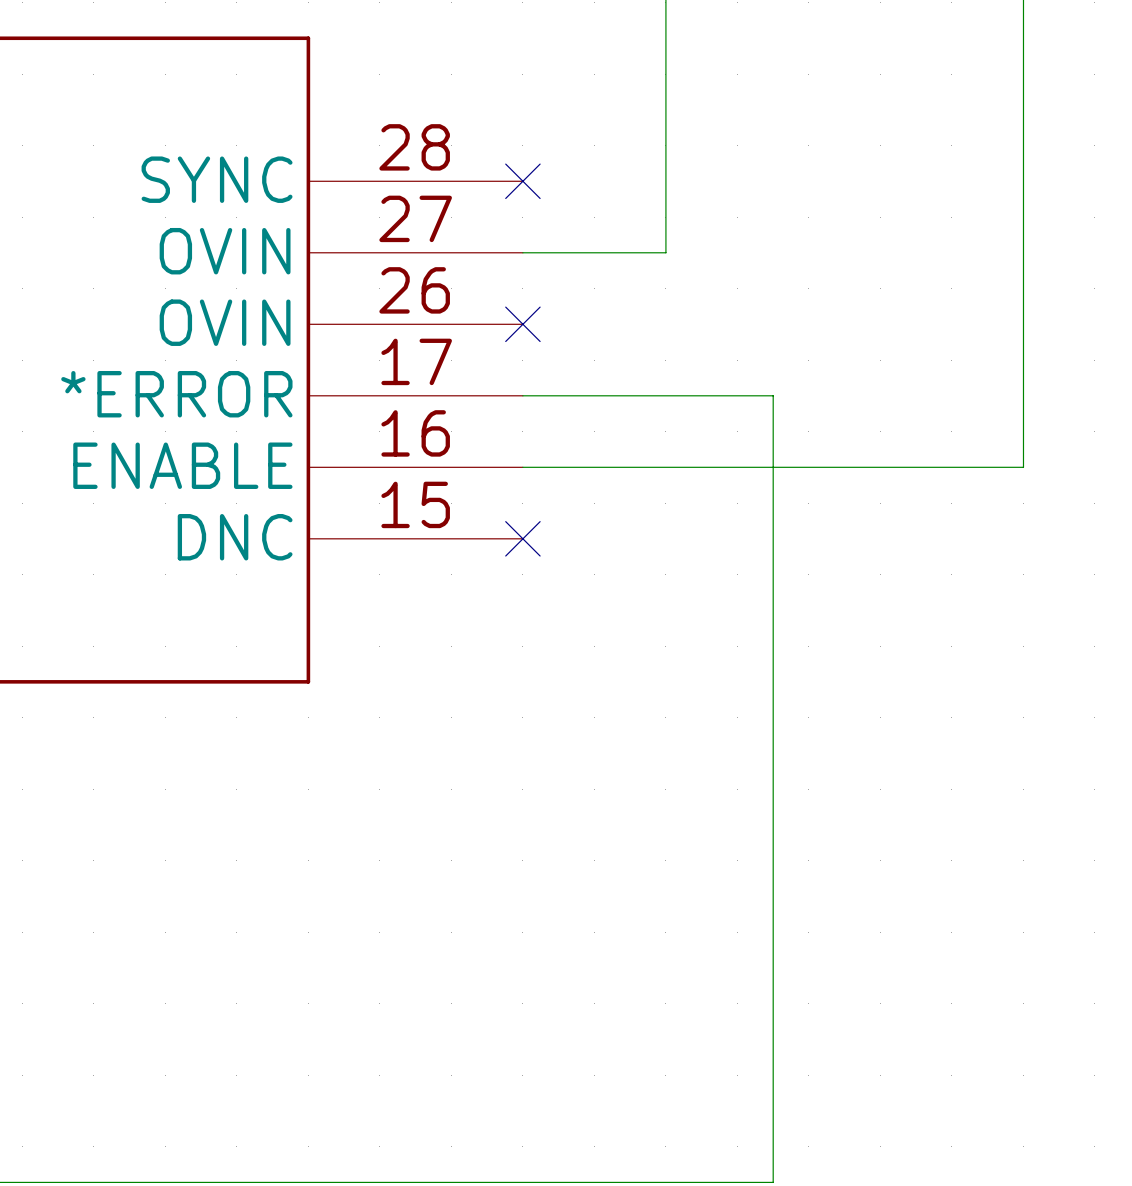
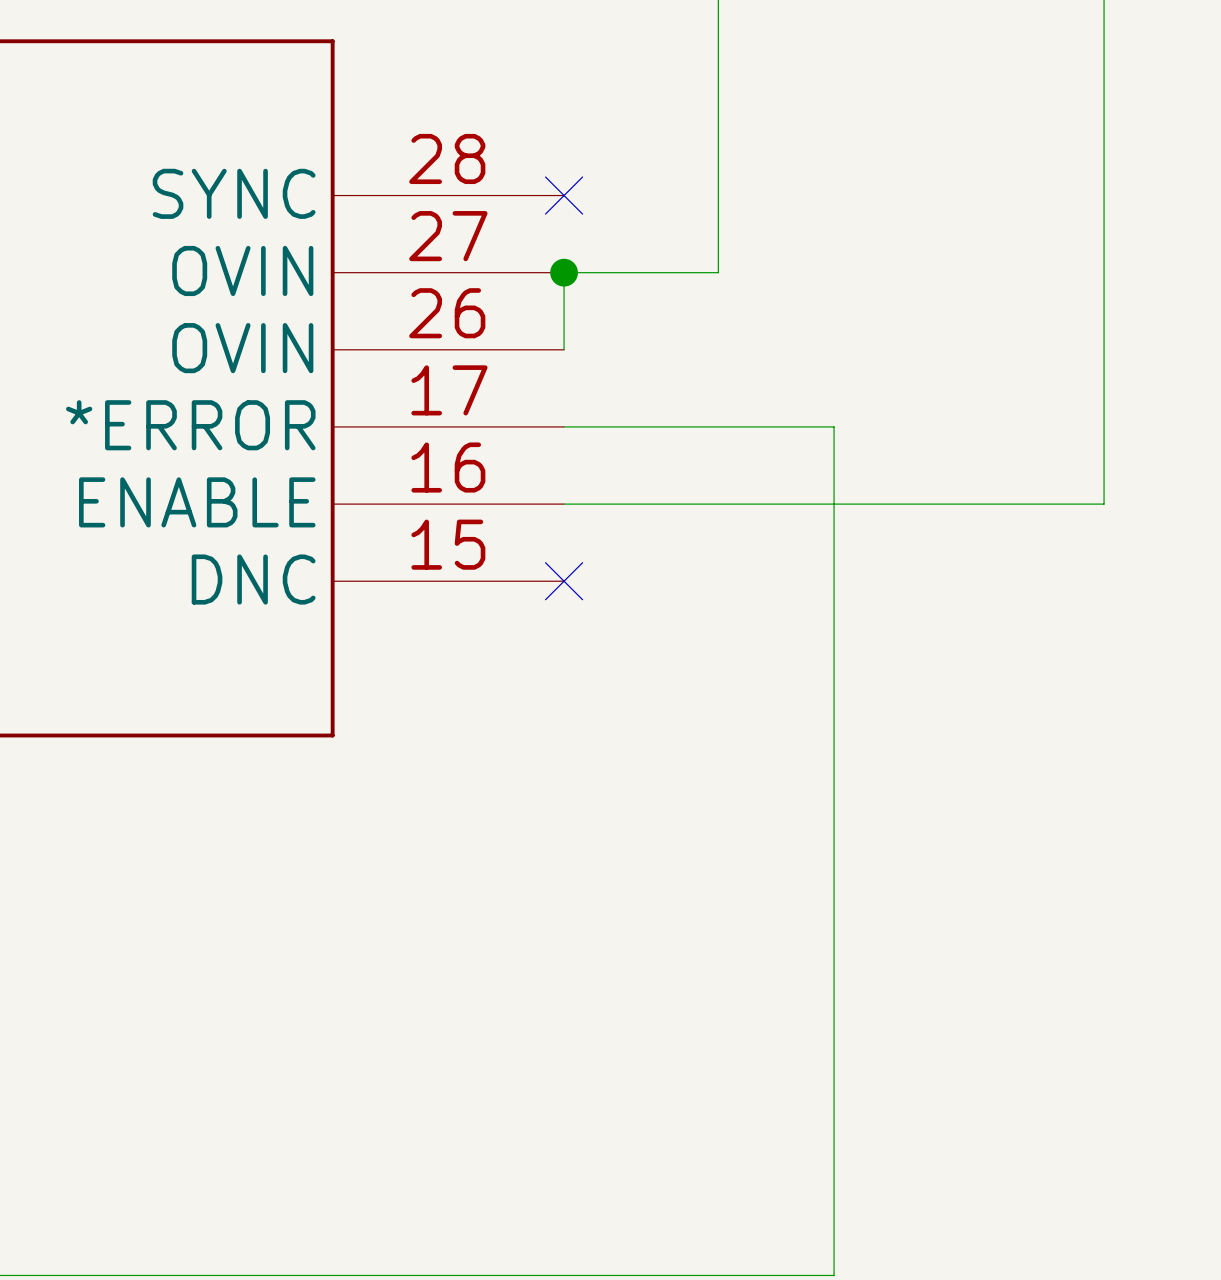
wire: none -> (564, 272) (564, 349)
junction: none -> (564, 272)
no-connect mark: (522, 324) -> none

